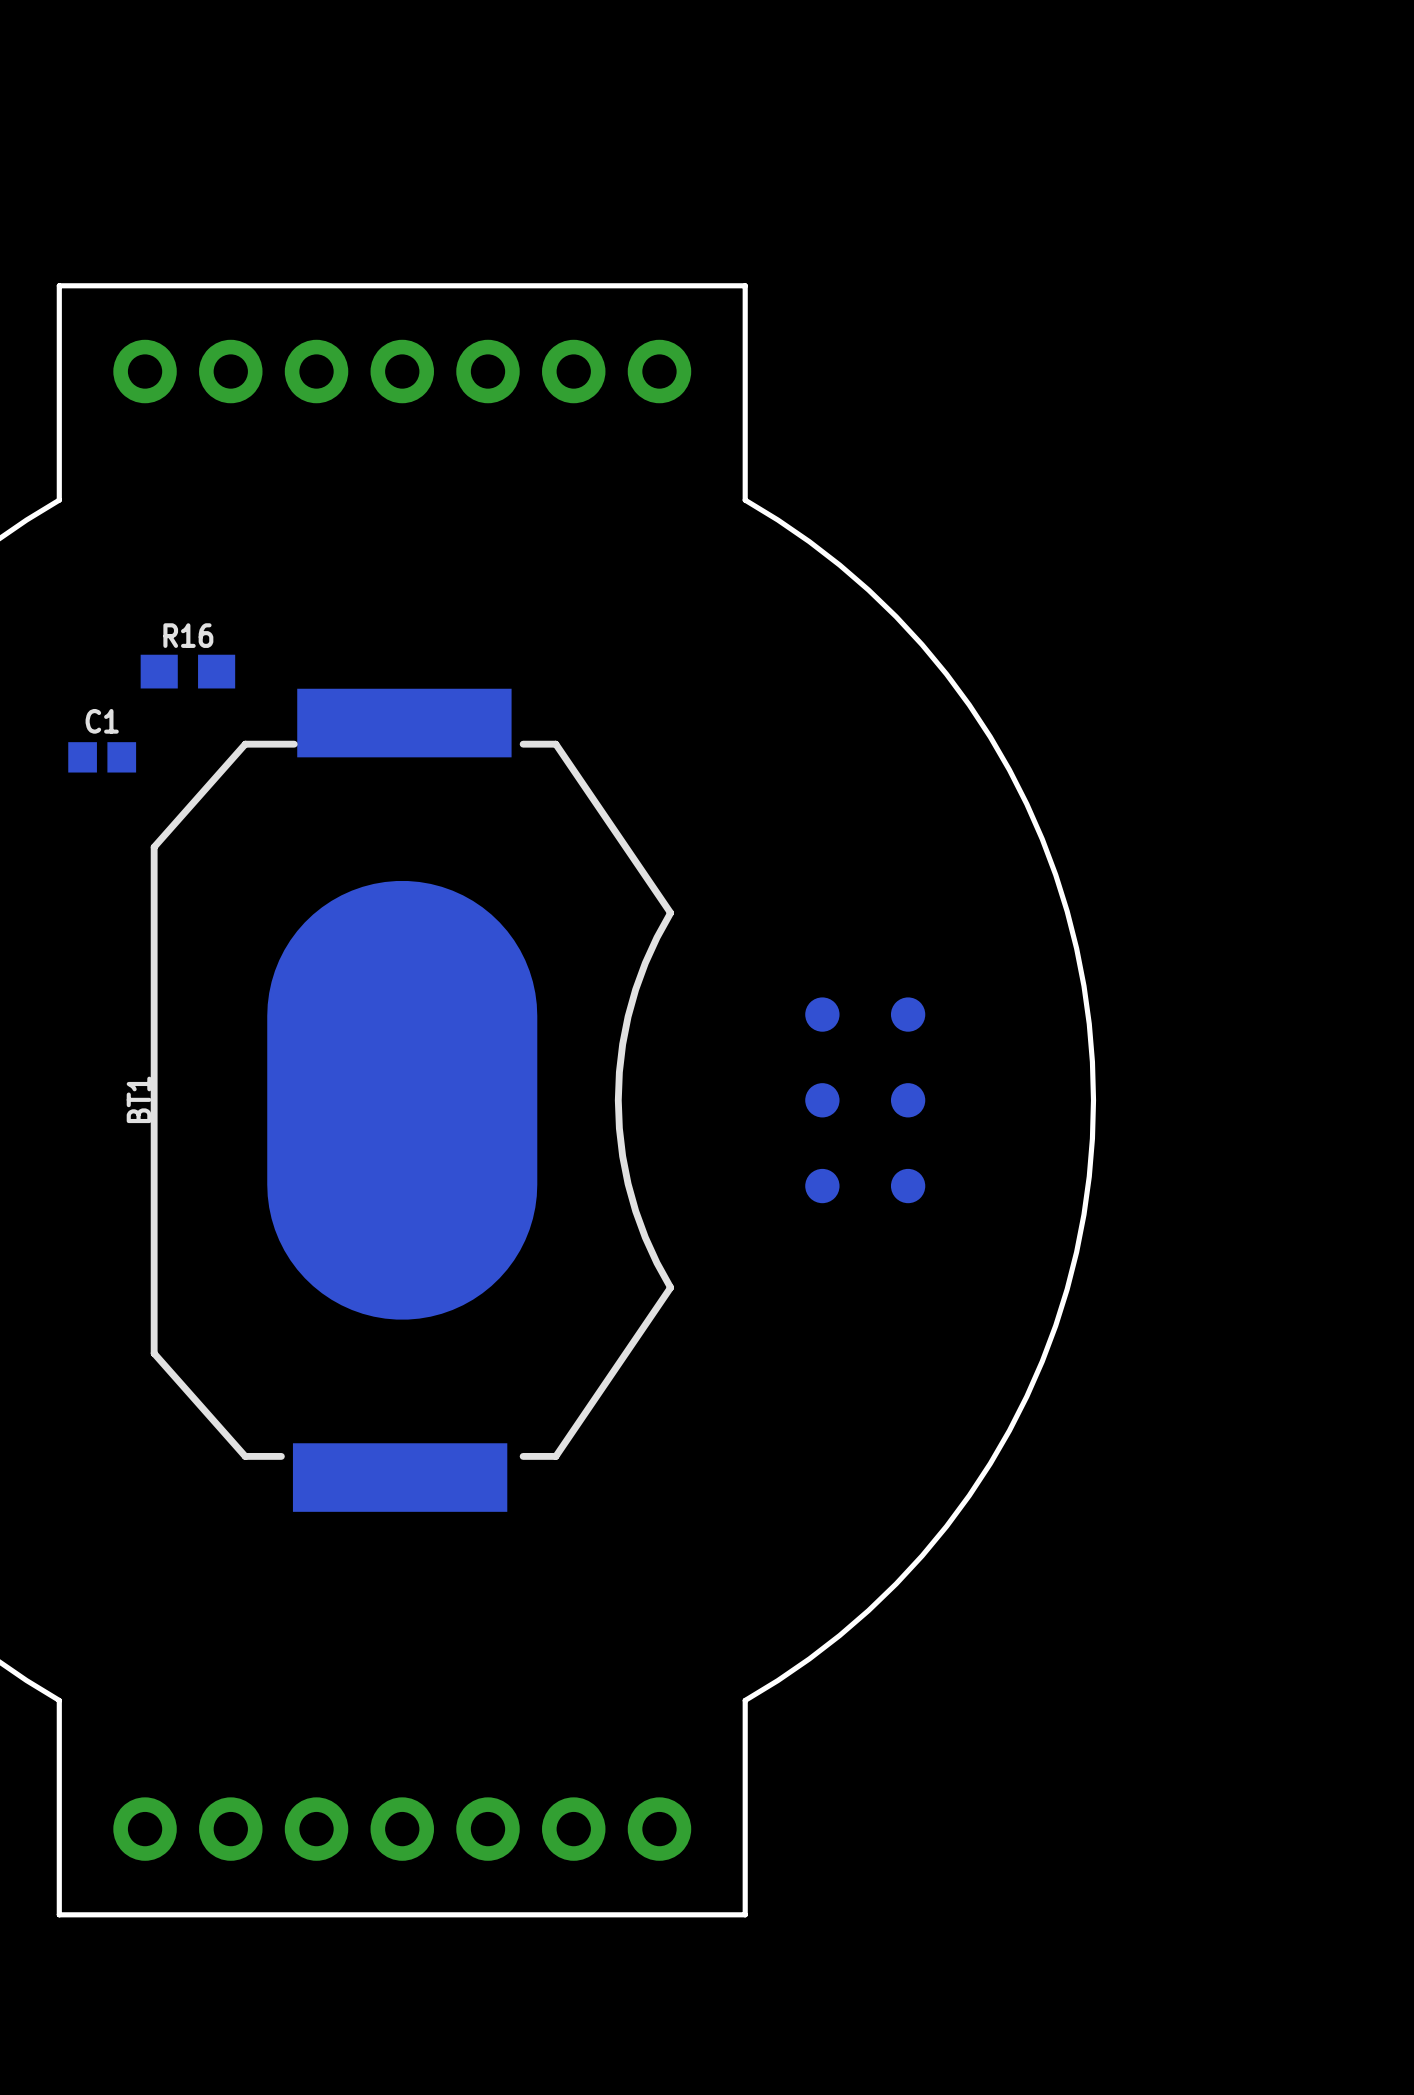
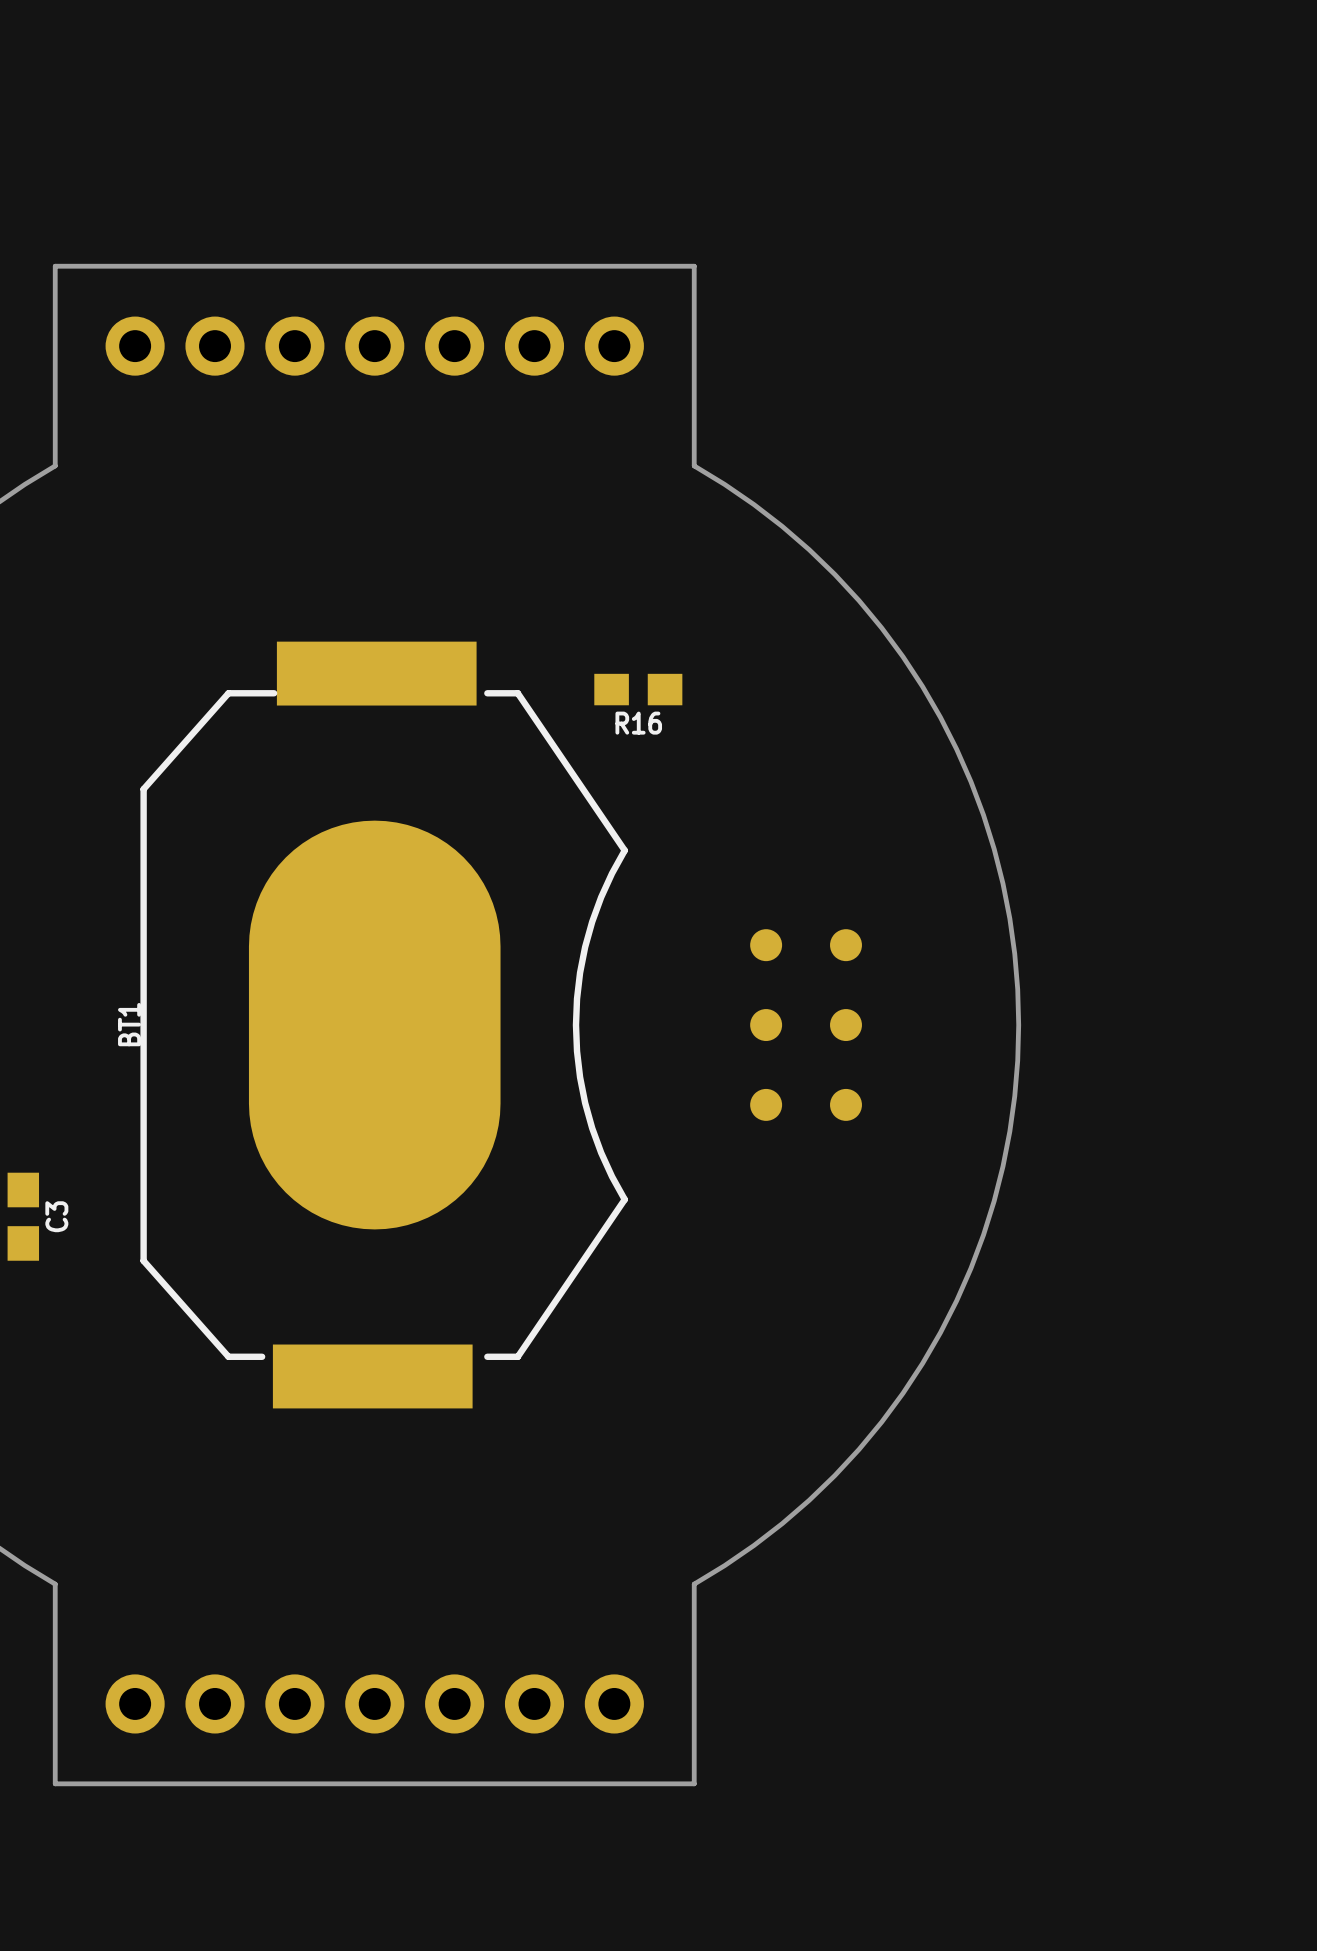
R16 name position: R16 (188, 635) -> R16 (638, 723)
R16 position: (187, 671) -> (638, 689)
C1: (102, 757) -> none
C3: none -> (23, 1216)

